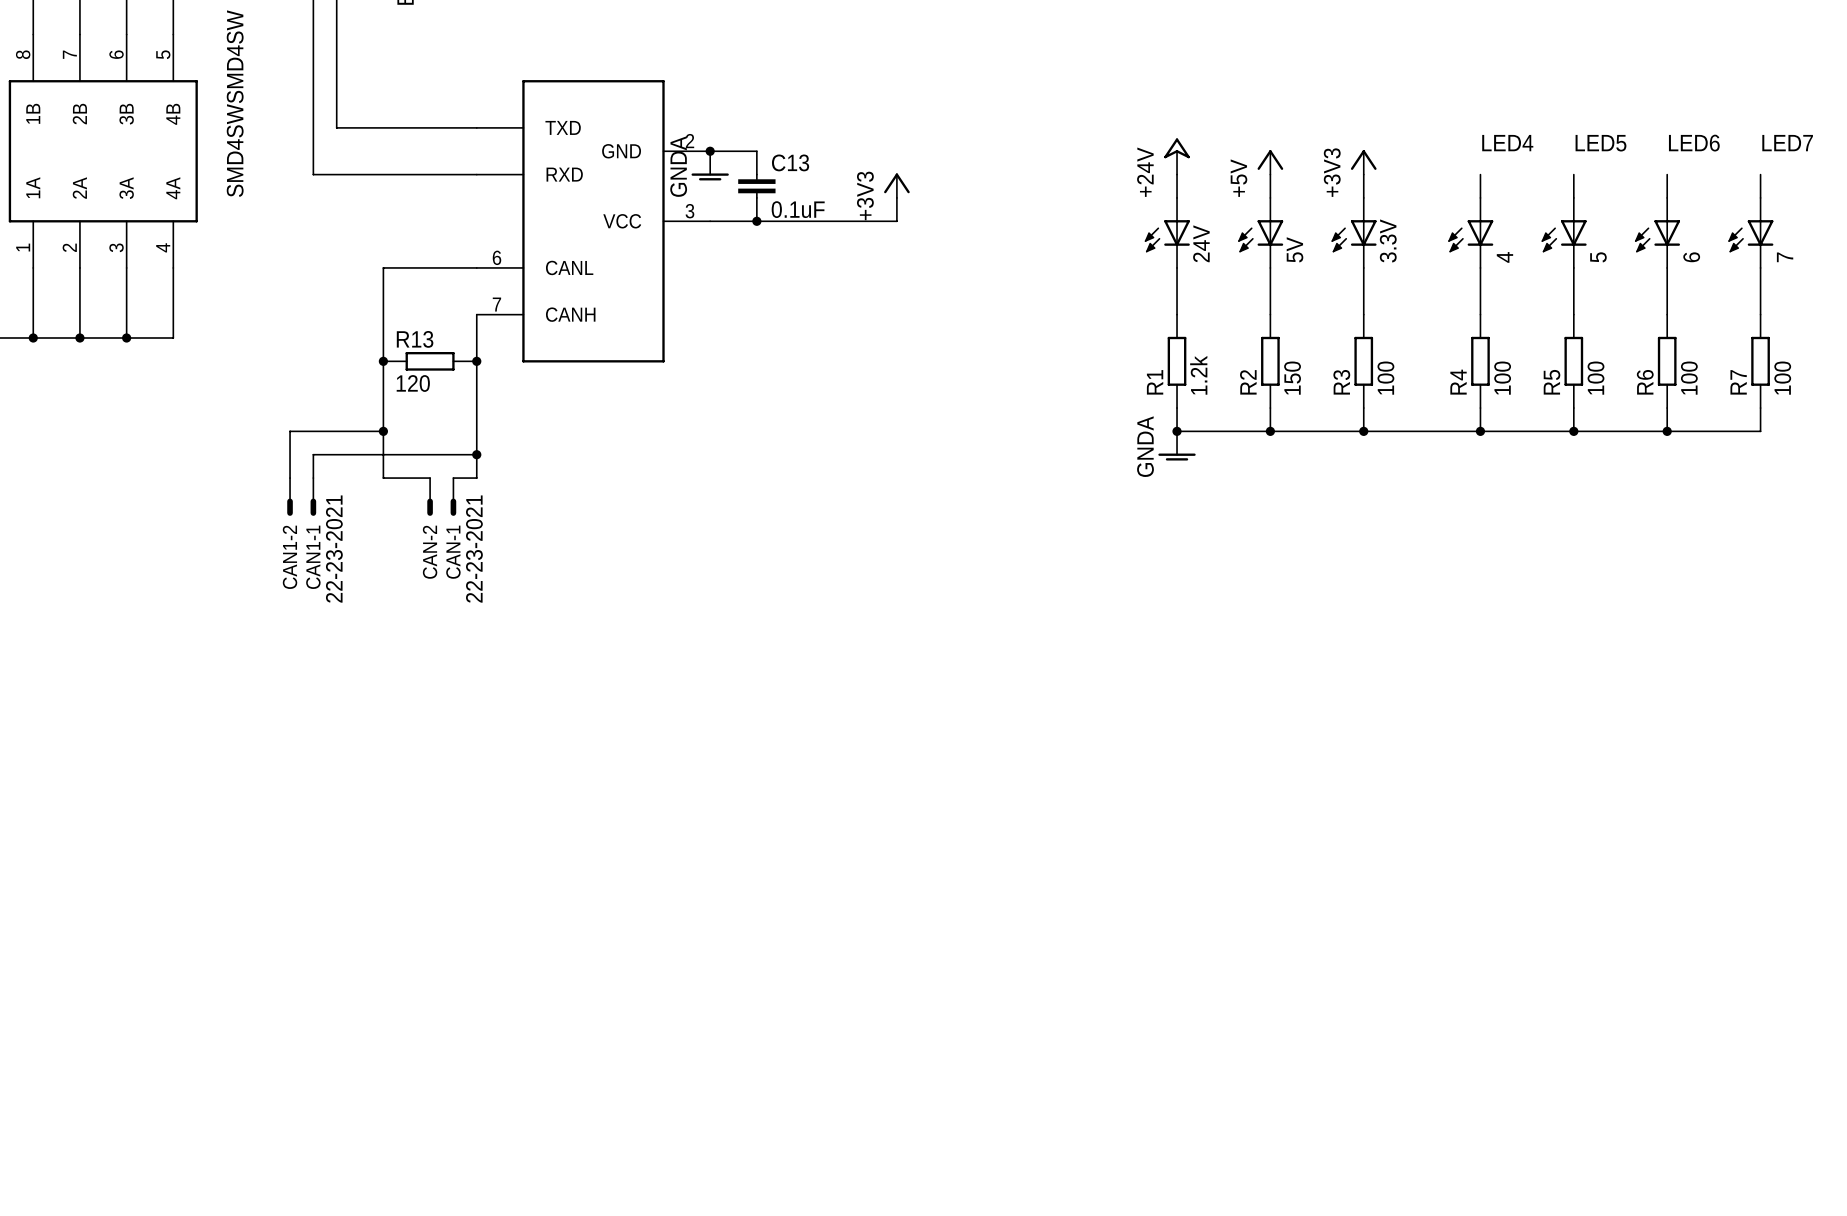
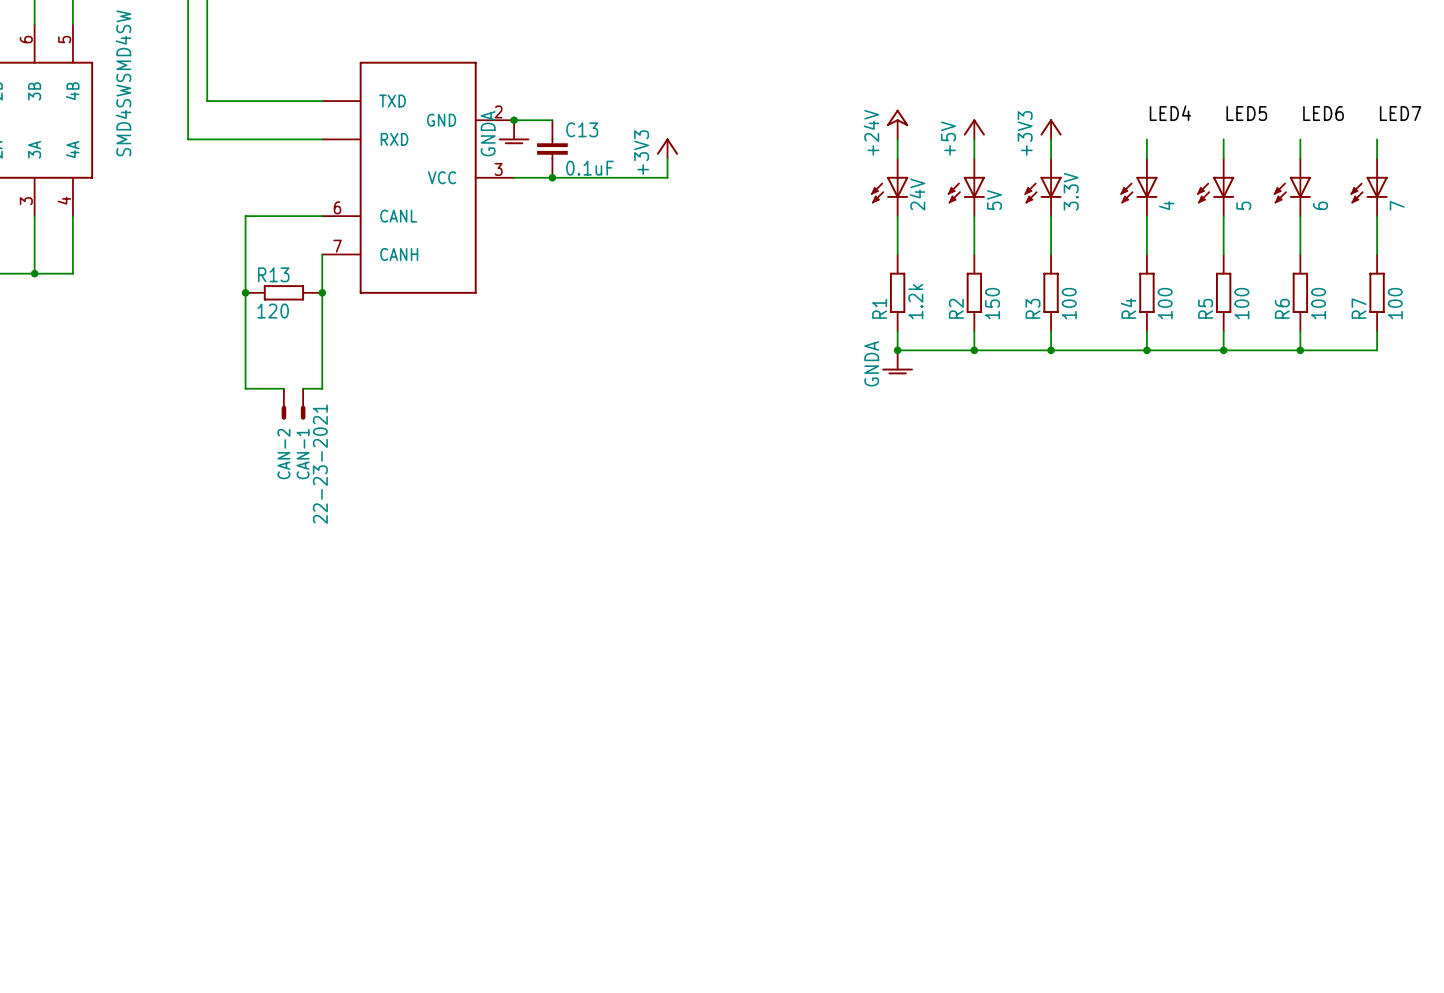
wire: (383, 431) (290, 431) (290, 478) -> none
junction: (383, 431) -> none
wire: (476, 454) (313, 454) (313, 478) -> none
junction: (476, 454) -> none
CAN1-2: (290, 496) -> none
CAN1-1: 22-23-2021 (313, 496) -> none

